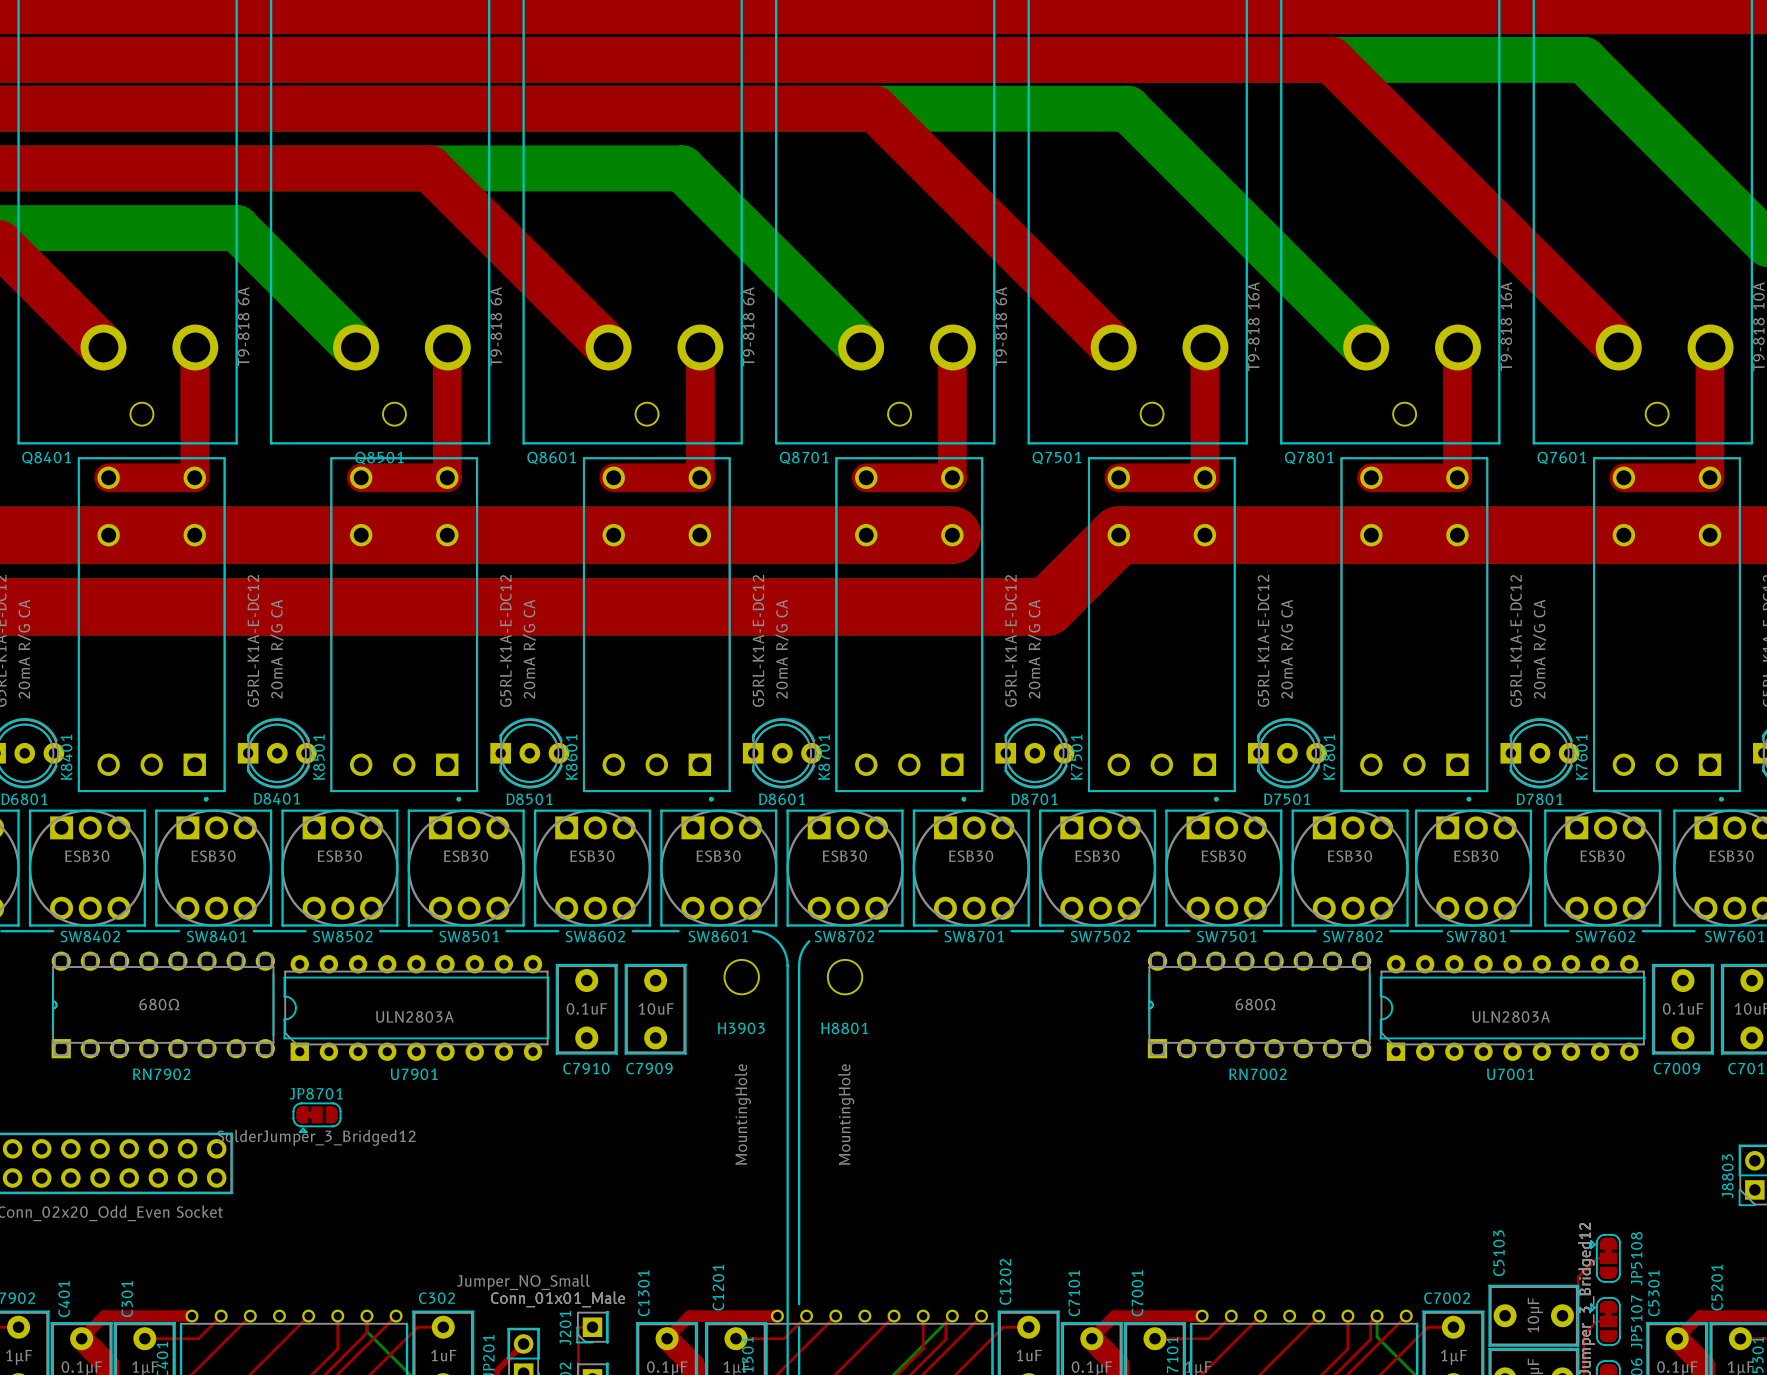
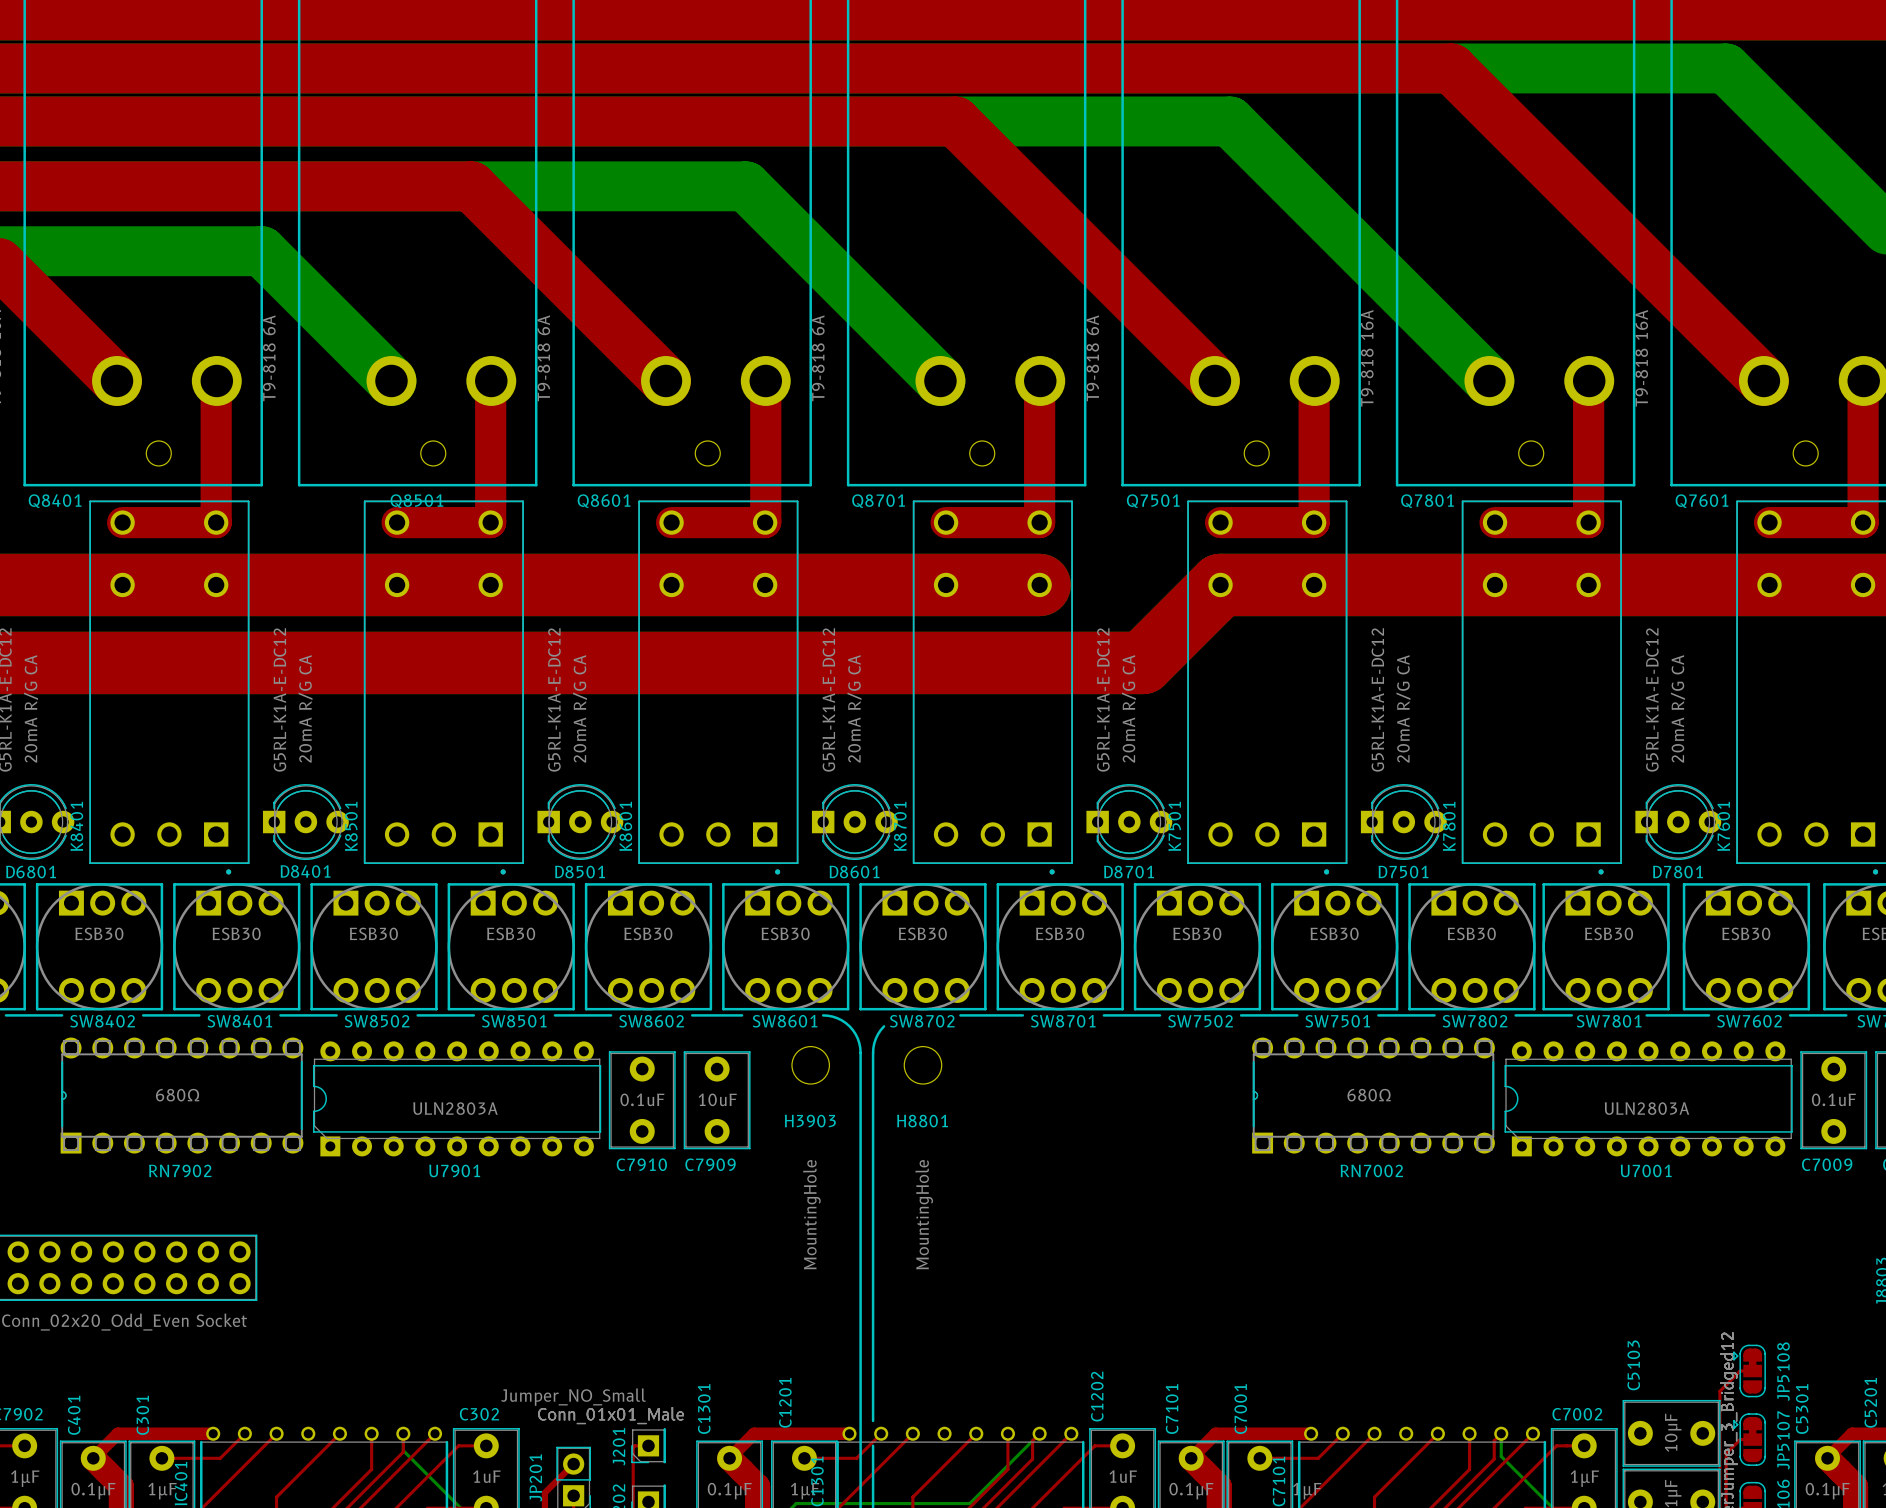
JP8701: SolderJumper_3_Bridged12 (316, 1117) -> none

